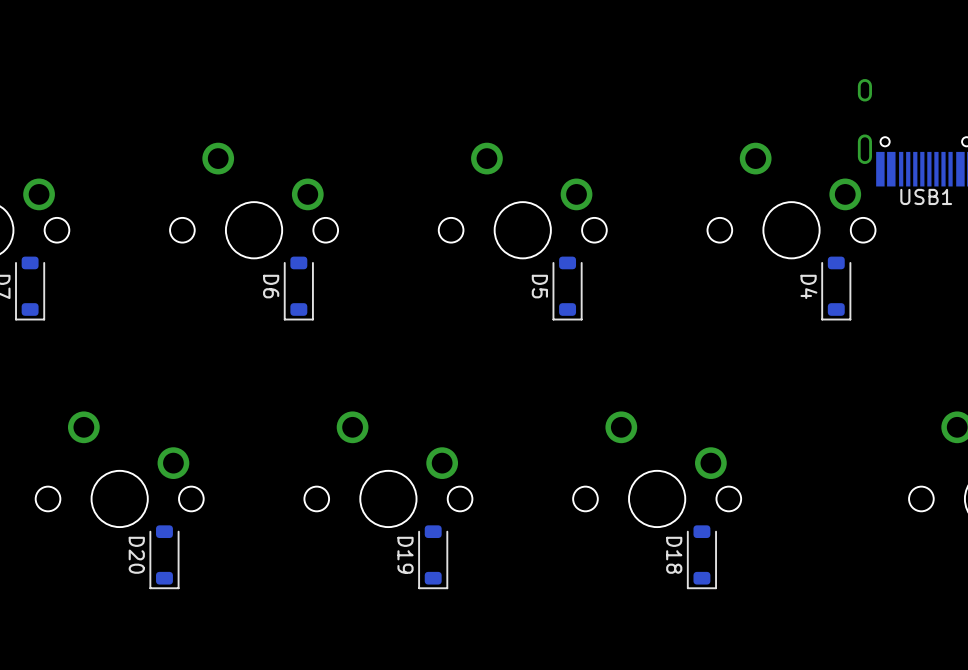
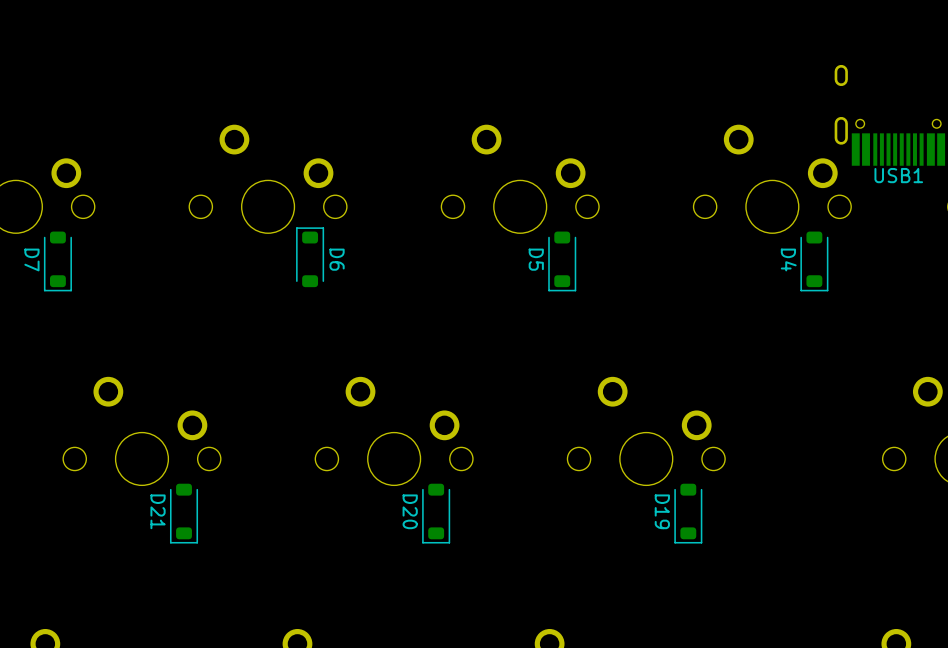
D6 rotation: 0° (298, 288) -> 180° (310, 257)
D20 name: D20 (136, 555) -> D21 (158, 511)
D19 name: D19 (405, 555) -> D20 (410, 511)
D18 name: D18 (674, 555) -> D19 (662, 511)

